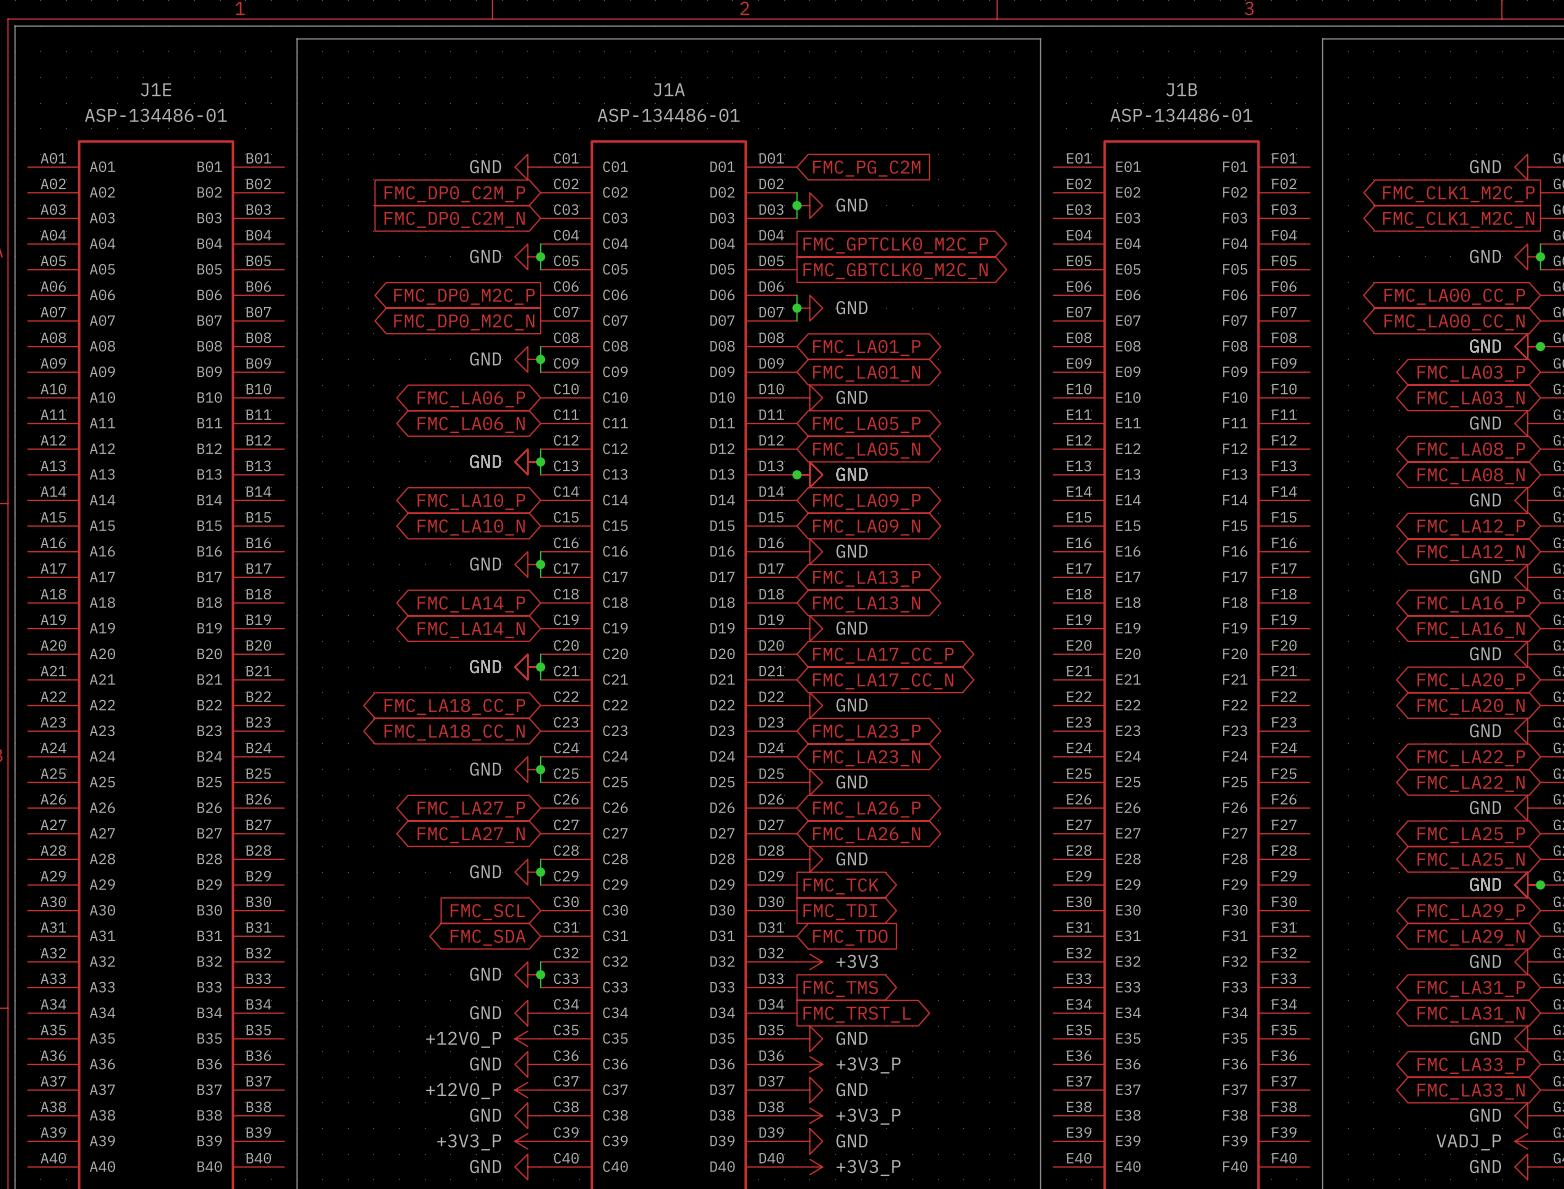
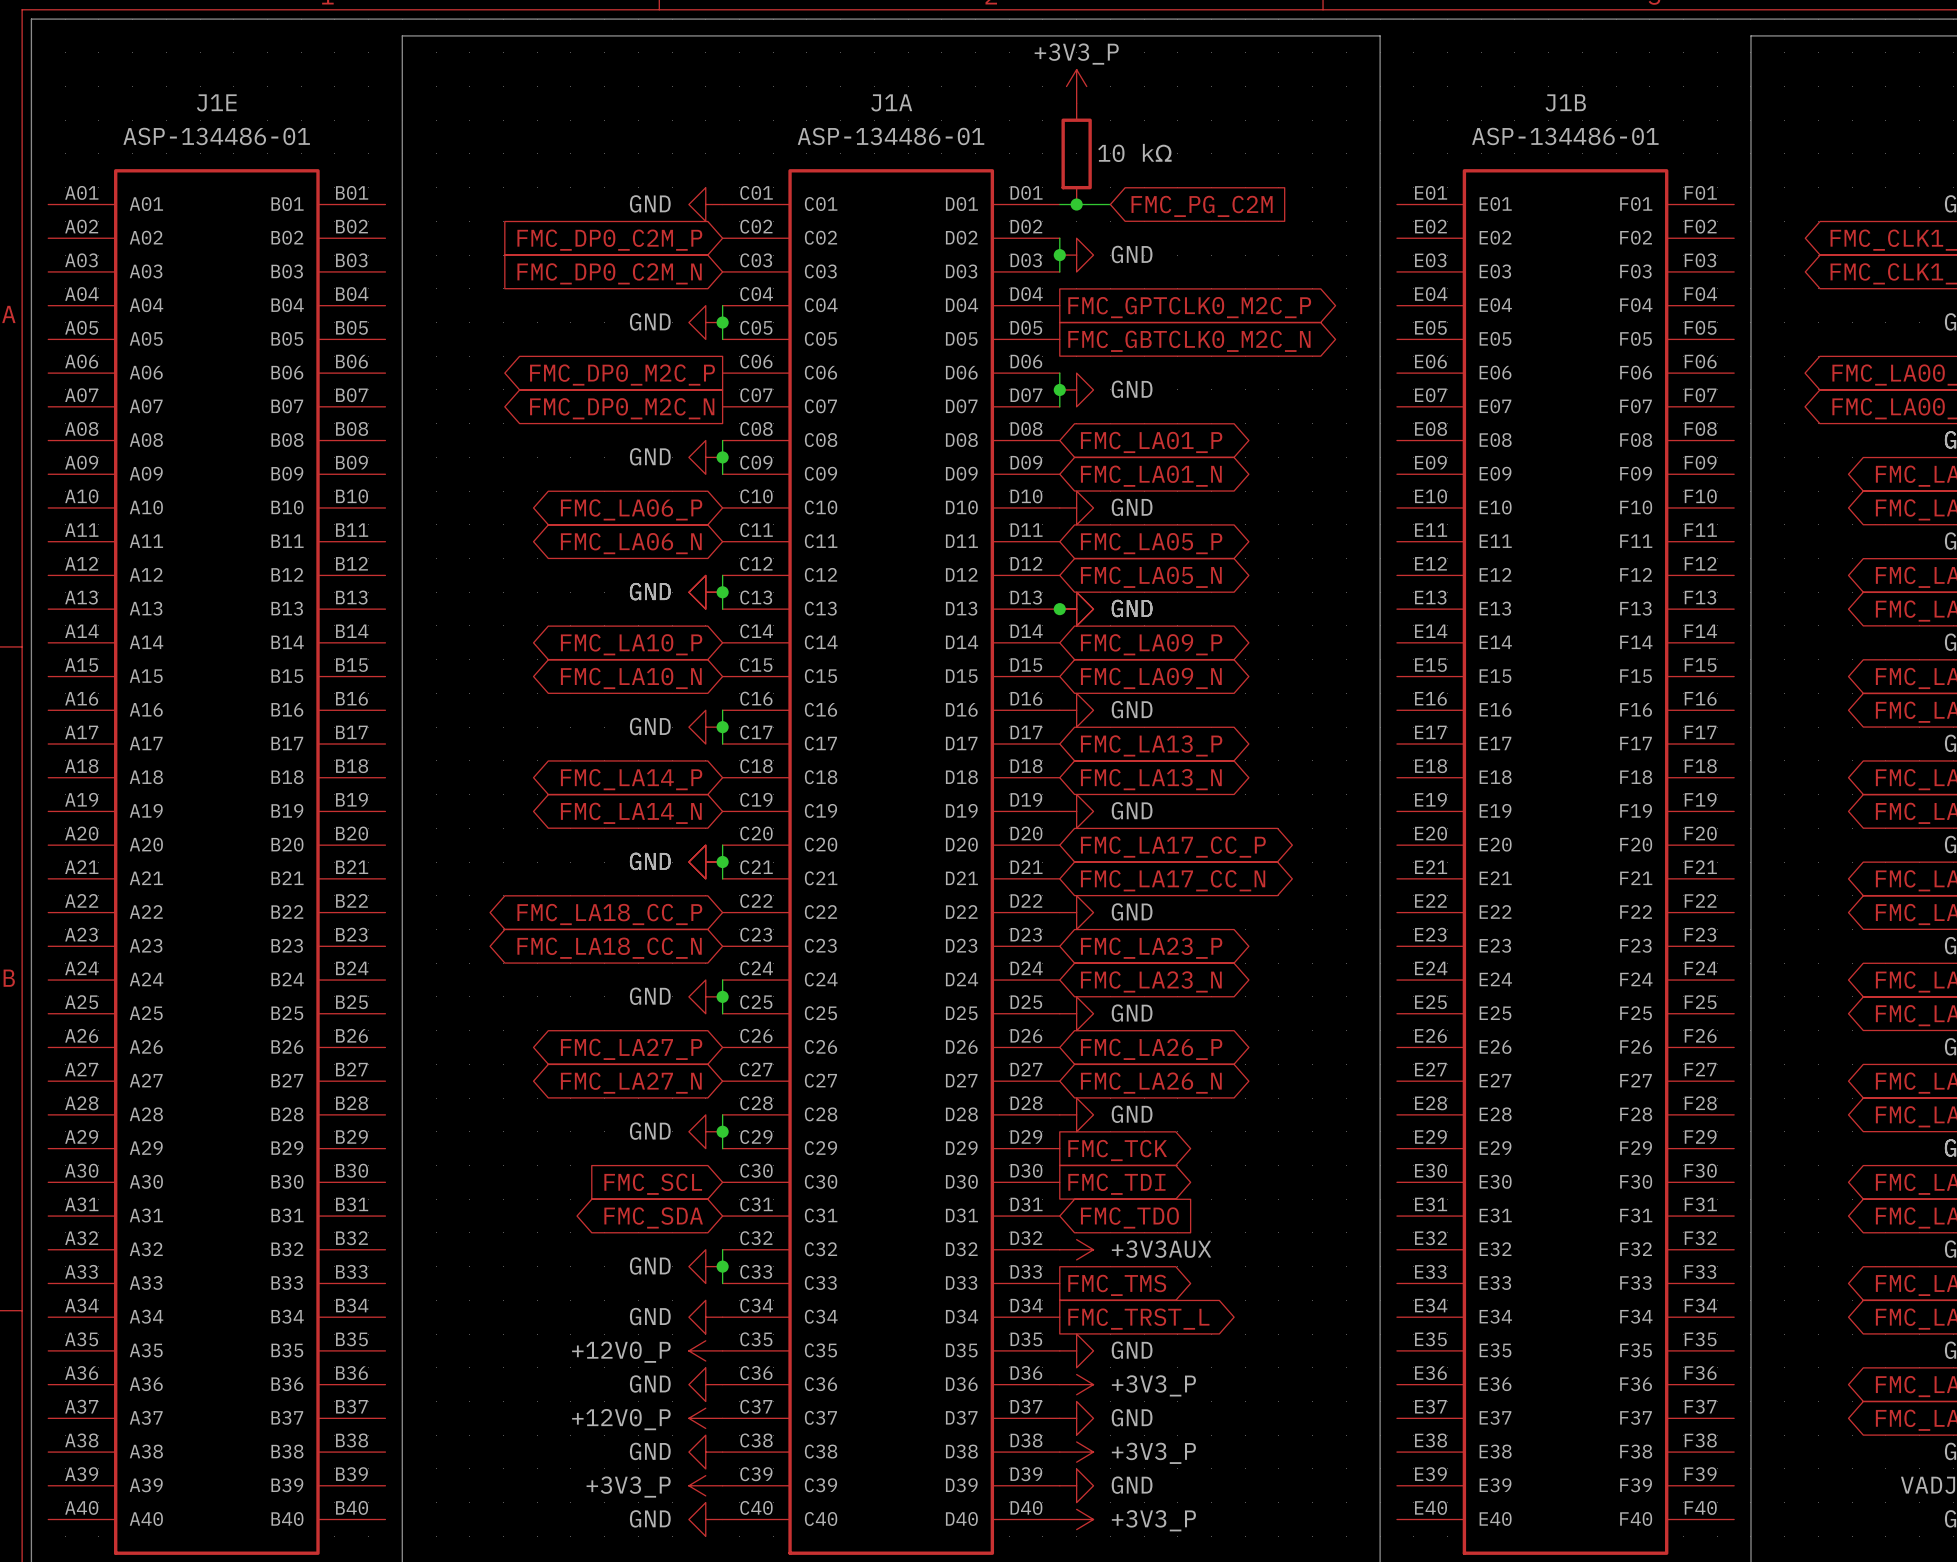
power symbol: none -> +3V3_P (1076, 86)
part: none -> 10 kΩ (1076, 153)
wire: none -> (1059, 204) (1110, 204)
junction: none -> (1076, 204)
global label position: FMC_PG_C2M (866, 168) -> FMC_PG_C2M (1202, 206)
power symbol: +3V3 (809, 961) -> +3V3AUX (1076, 1249)

